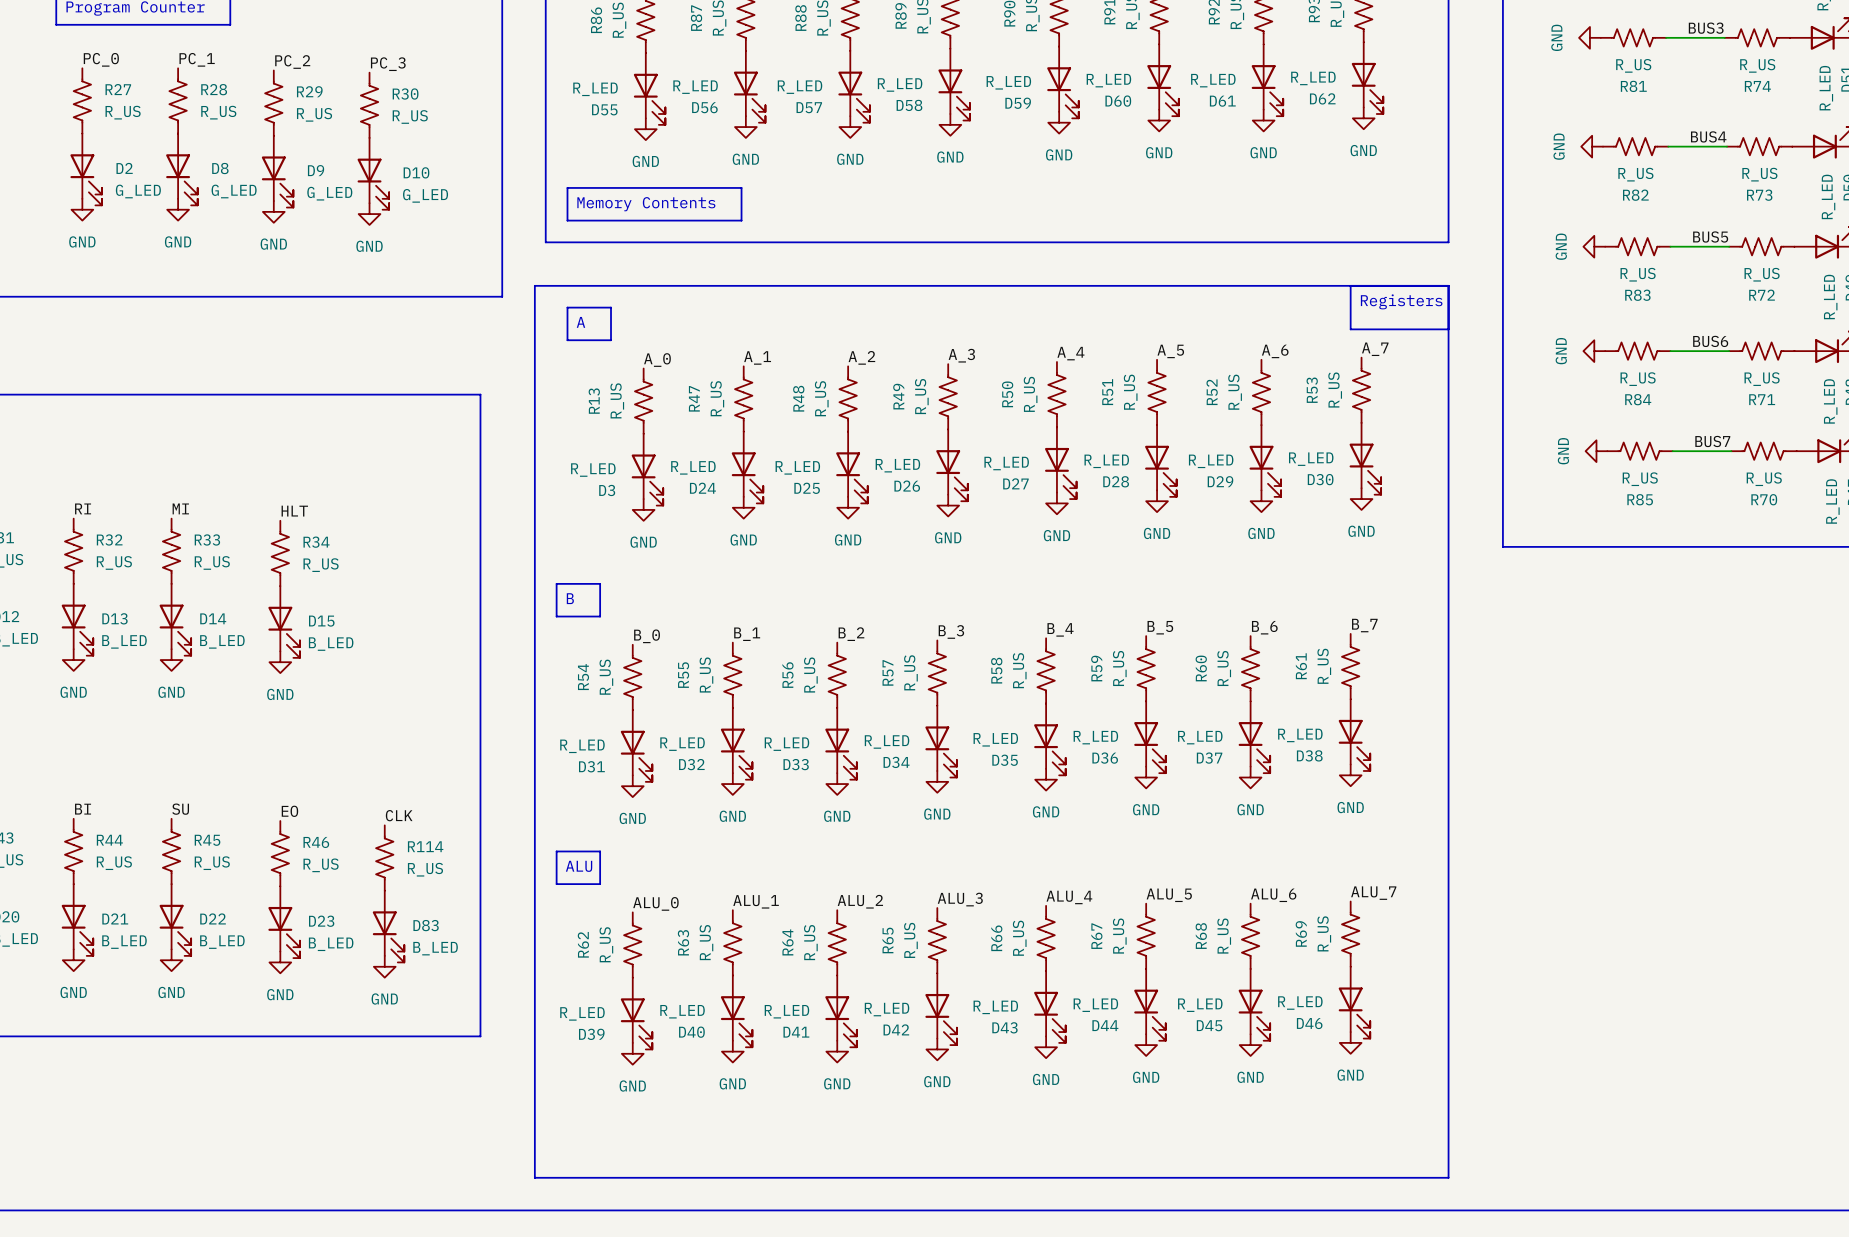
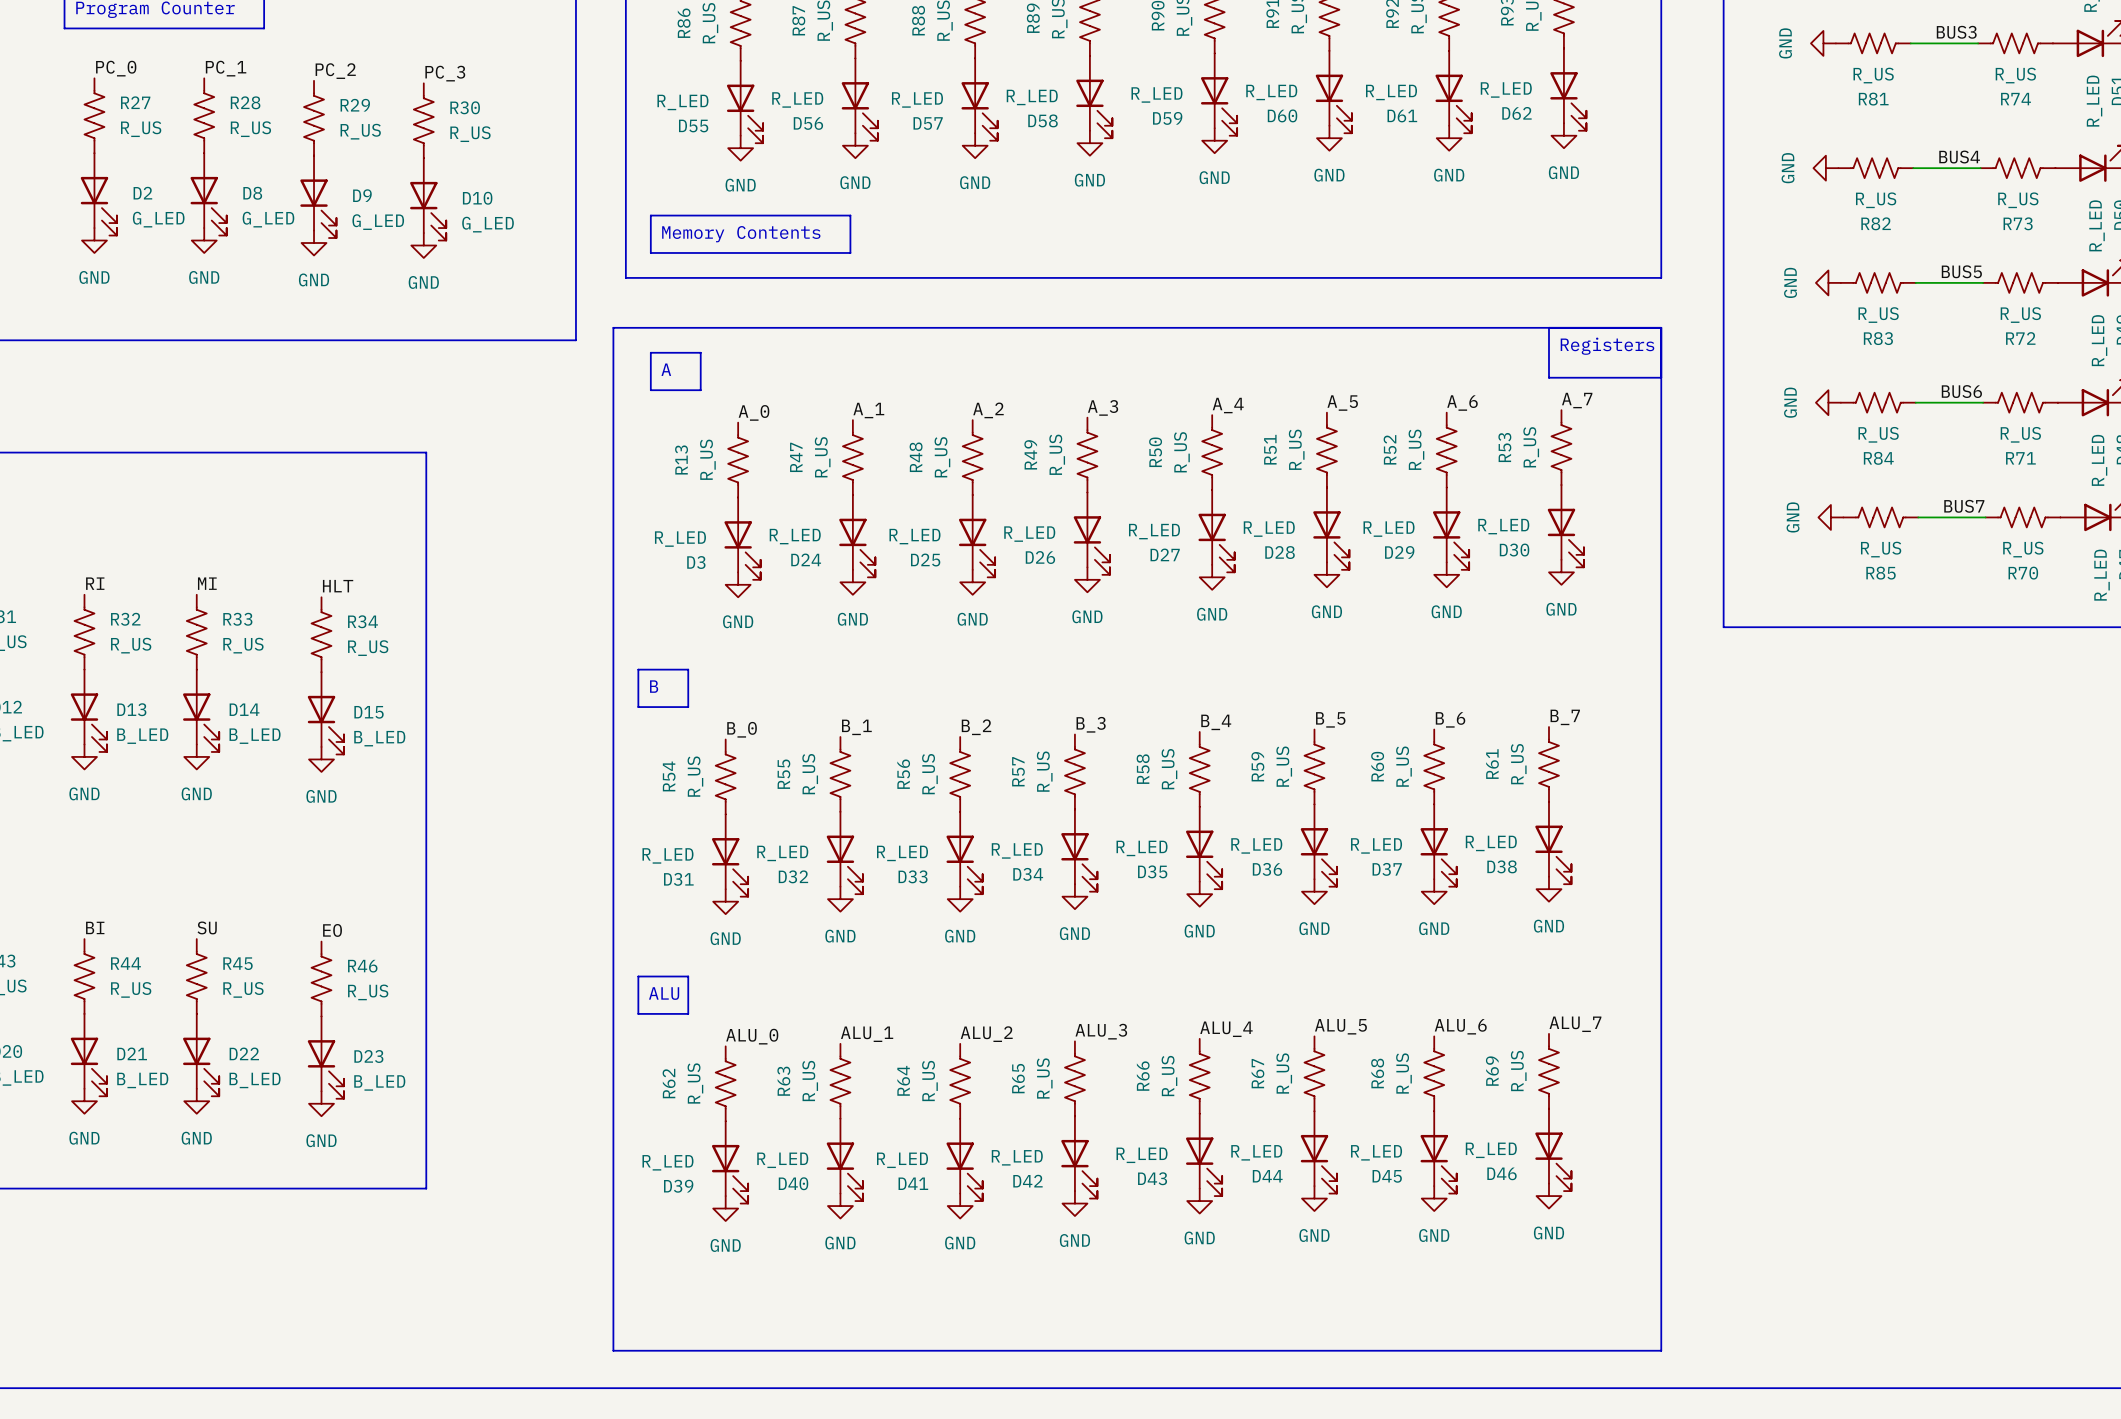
line: (371, 394) (480, 394) (480, 1036) (371, 1036) -> (426, 452) (426, 1188)
label: CLK (399, 815) -> none
R114: R_US (384, 858) -> none
D83: B_LED (388, 926) -> none
power symbol: GND (384, 966) -> none

